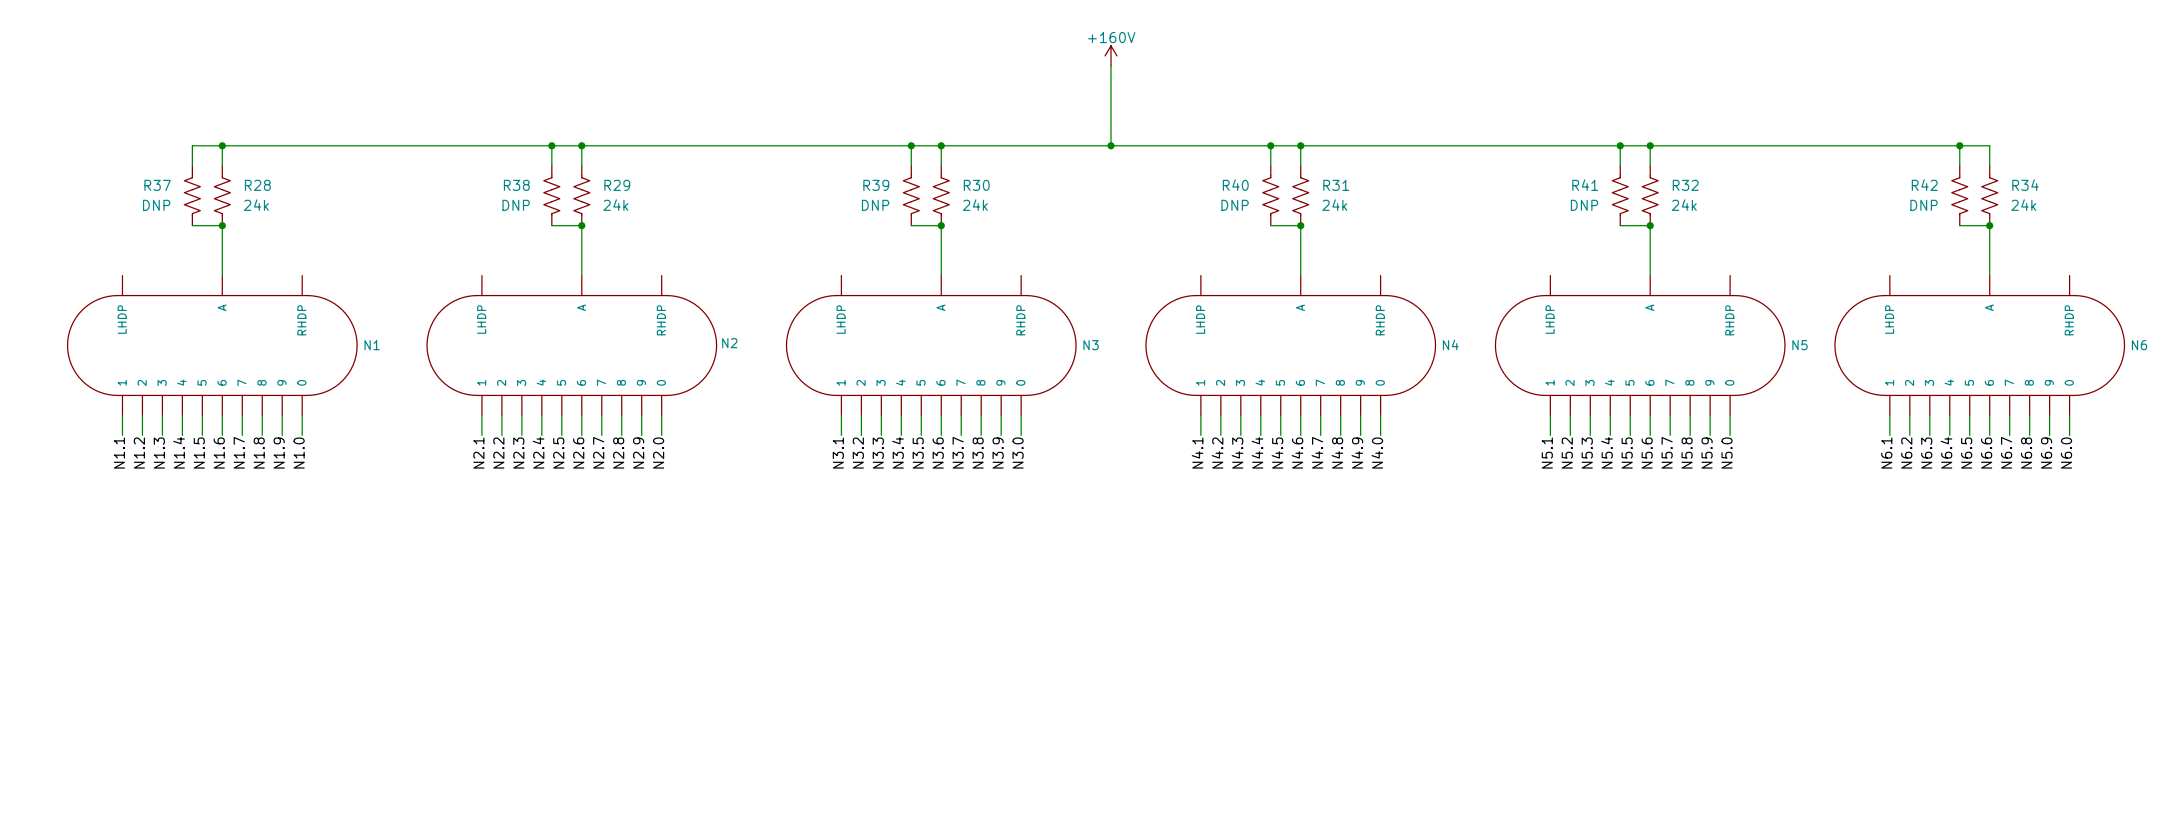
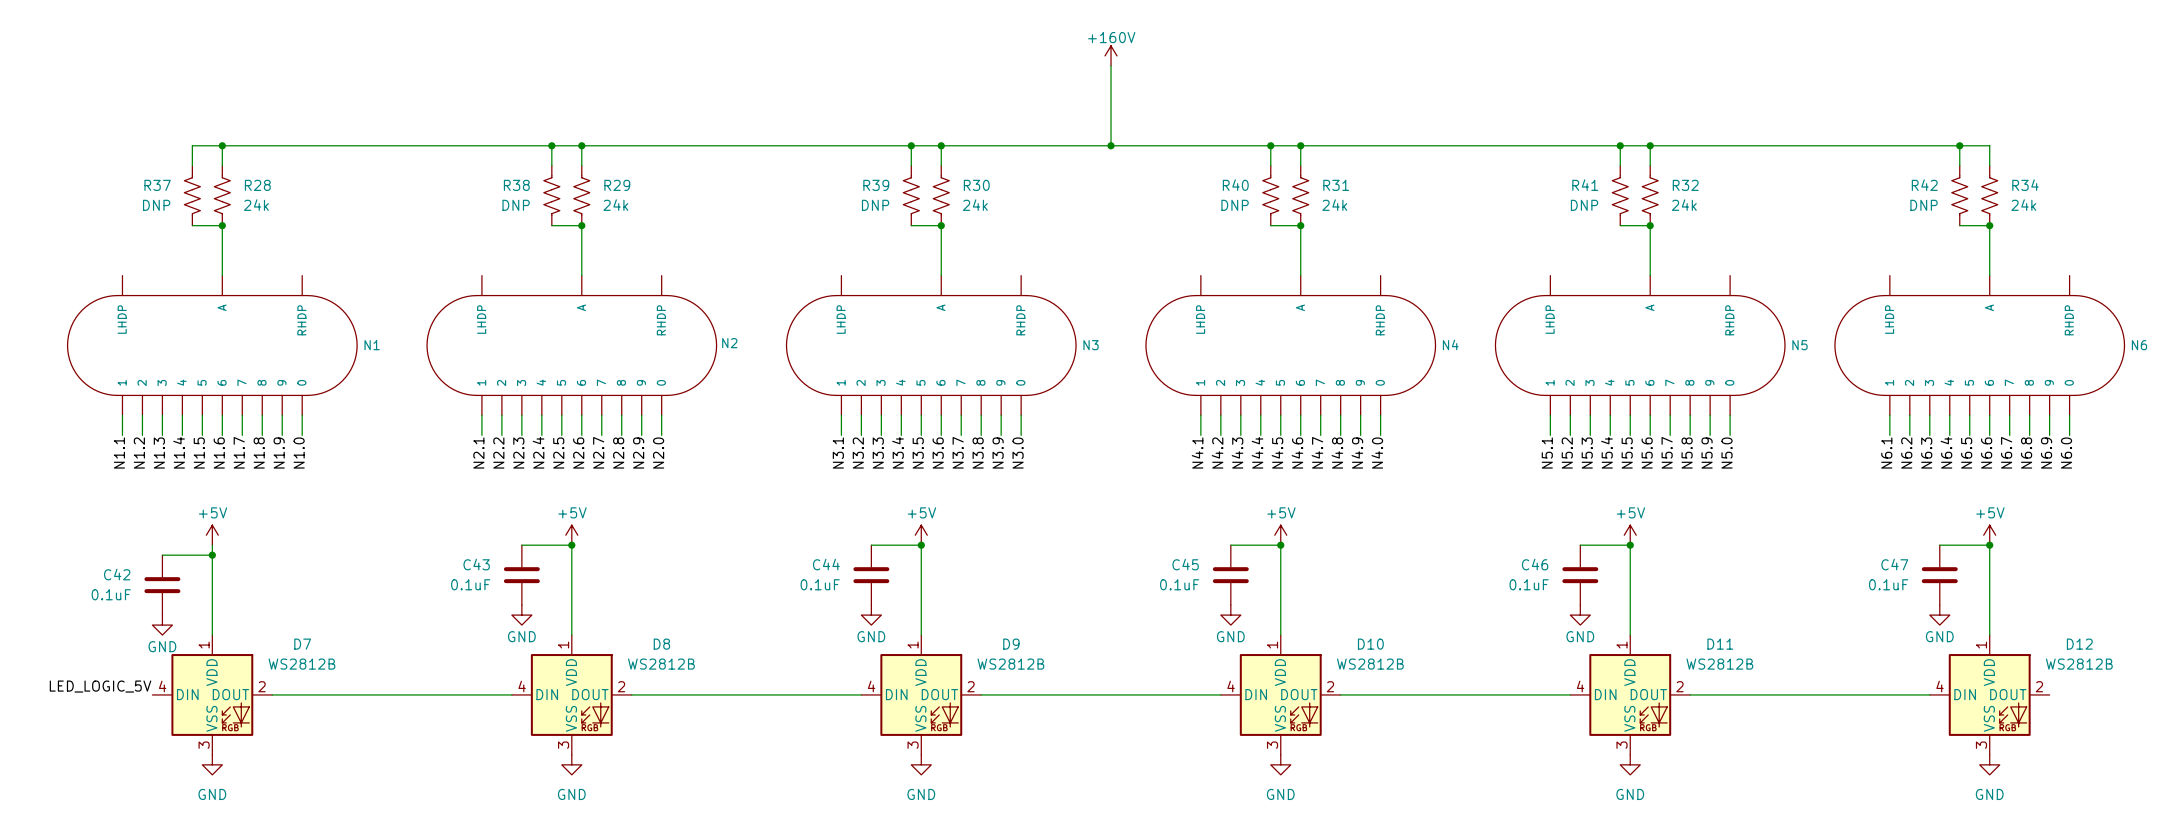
power symbol: none -> +5V (212, 535)
power symbol: none -> +5V (571, 535)
power symbol: none -> +5V (921, 535)
power symbol: none -> +5V (1280, 535)
power symbol: none -> +5V (1630, 535)
power symbol: none -> +5V (1989, 535)
wire: none -> (212, 545) (212, 635)
wire: none -> (521, 545) (571, 545) (571, 635)
junction: none -> (571, 545)
wire: none -> (871, 545) (921, 545) (921, 635)
junction: none -> (921, 545)
wire: none -> (1230, 545) (1280, 545) (1280, 635)
junction: none -> (1280, 545)
wire: none -> (1580, 545) (1630, 545) (1630, 635)
junction: none -> (1630, 545)
wire: none -> (1939, 545) (1989, 545) (1989, 635)
junction: none -> (1989, 545)
wire: none -> (162, 555) (212, 555)
junction: none -> (212, 555)
C43: none -> 0.1uF (521, 575)
C44: none -> 0.1uF (871, 575)
C45: none -> 0.1uF (1230, 575)
C46: none -> 0.1uF (1580, 575)
C47: none -> 0.1uF (1939, 575)
C42: none -> 0.1uF (162, 585)
power symbol: none -> GND (521, 615)
power symbol: none -> GND (871, 615)
power symbol: none -> GND (1230, 615)
power symbol: none -> GND (1580, 615)
power symbol: none -> GND (1939, 615)
power symbol: none -> GND (162, 625)
label: none -> LED_LOGIC_5V (100, 686)
D7: none -> WS2812B (212, 694)
wire: none -> (272, 694) (511, 694)
D8: none -> WS2812B (571, 694)
wire: none -> (631, 694) (861, 694)
D9: none -> WS2812B (921, 694)
wire: none -> (981, 694) (1220, 694)
D10: none -> WS2812B (1280, 694)
wire: none -> (1340, 694) (1570, 694)
D11: none -> WS2812B (1630, 694)
wire: none -> (1690, 694) (1929, 694)
D12: none -> WS2812B (1989, 694)
power symbol: none -> GND (212, 764)
power symbol: none -> GND (571, 764)
power symbol: none -> GND (921, 764)
power symbol: none -> GND (1280, 764)
power symbol: none -> GND (1630, 764)
power symbol: none -> GND (1989, 764)

